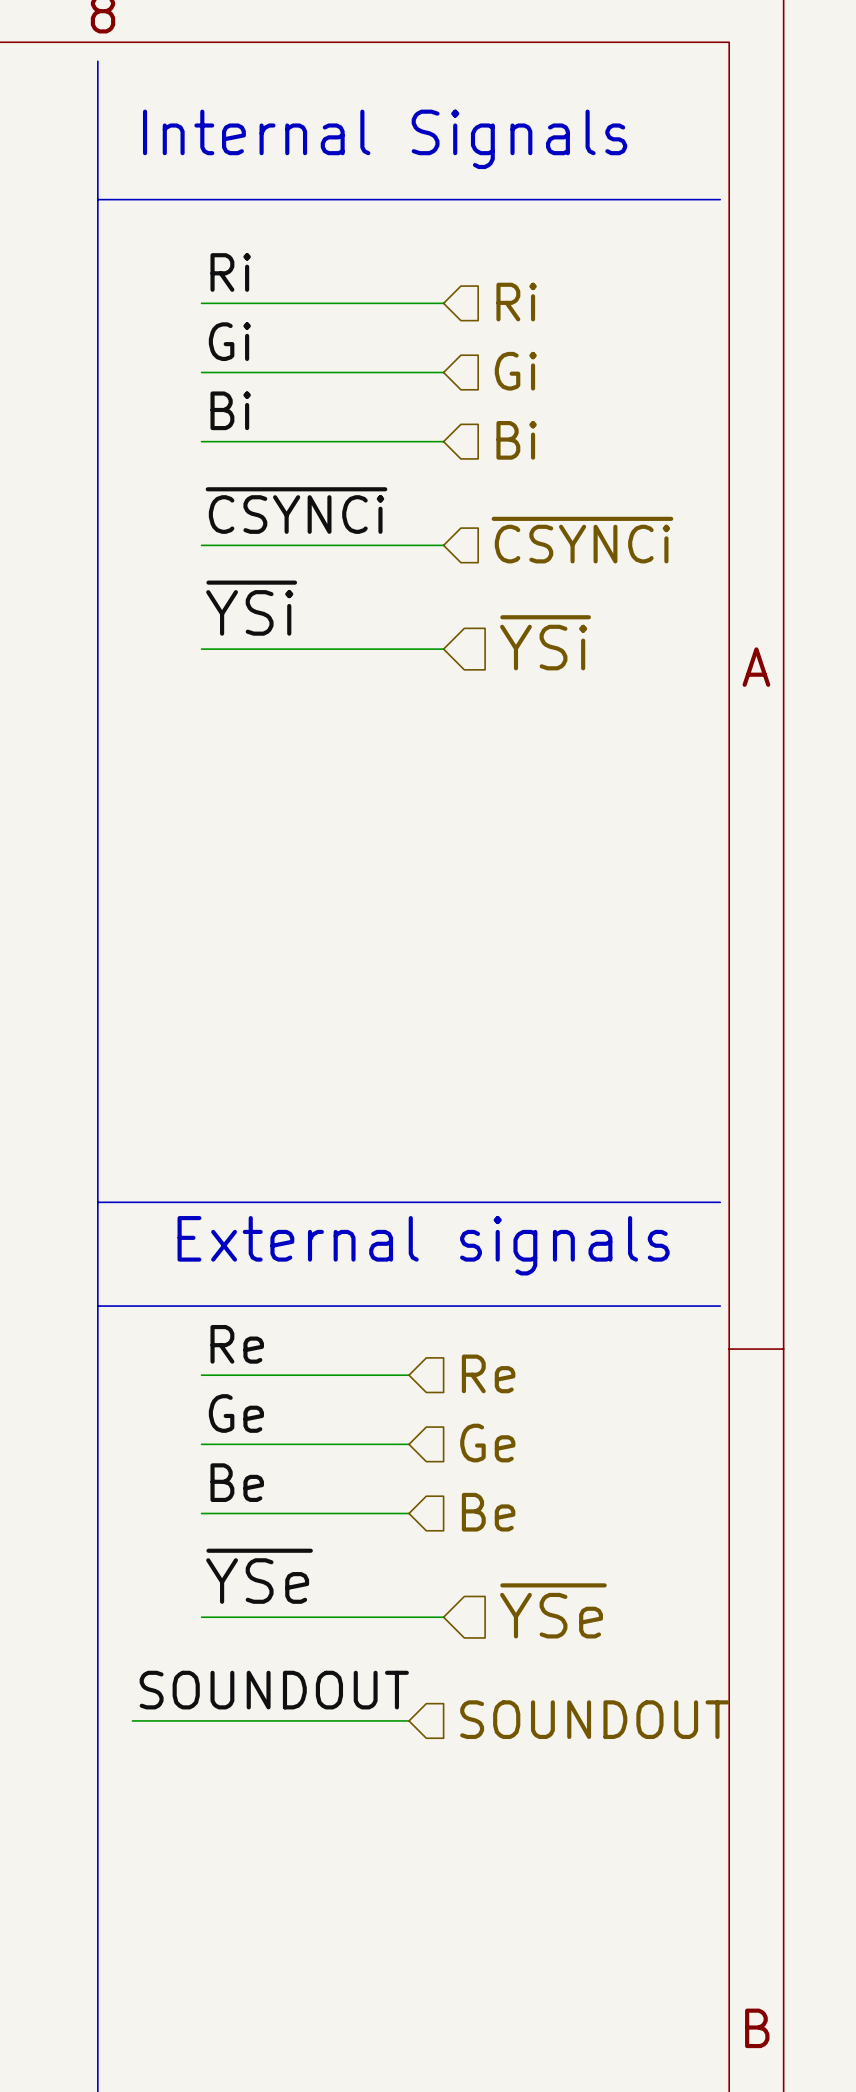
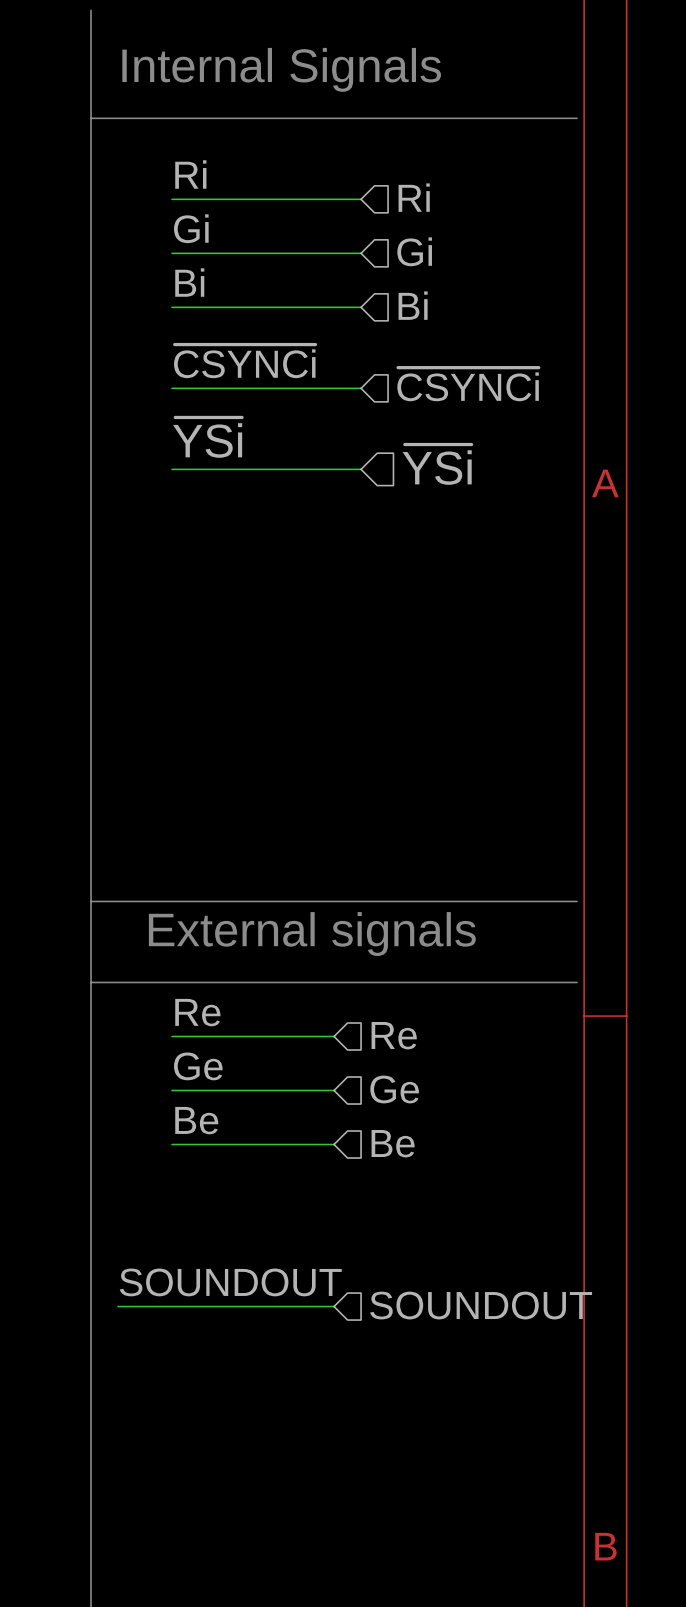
label: ~{YSe} (259, 1576) -> none
hierarchical label: ~{YSe} (553, 1610) -> none
wire: (201, 1617) (443, 1617) -> none

